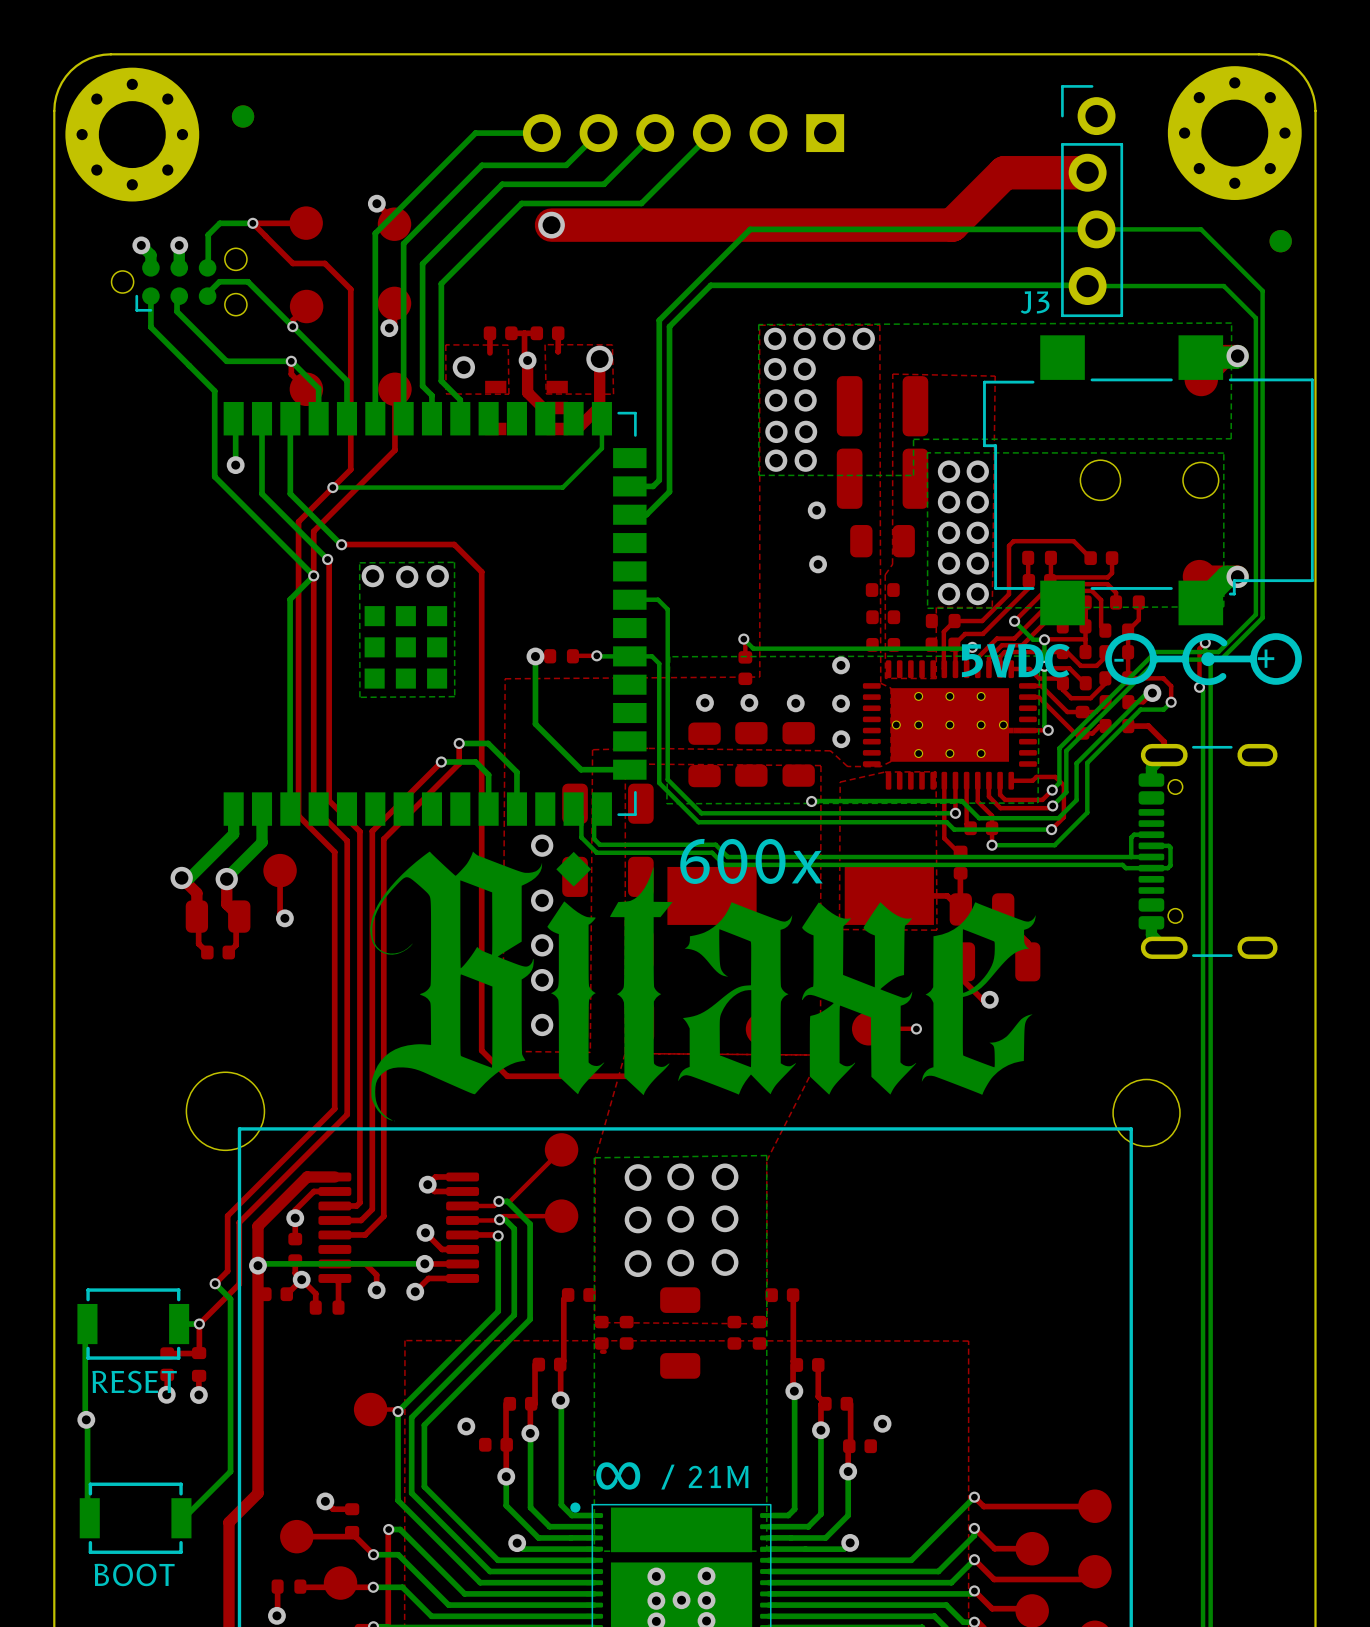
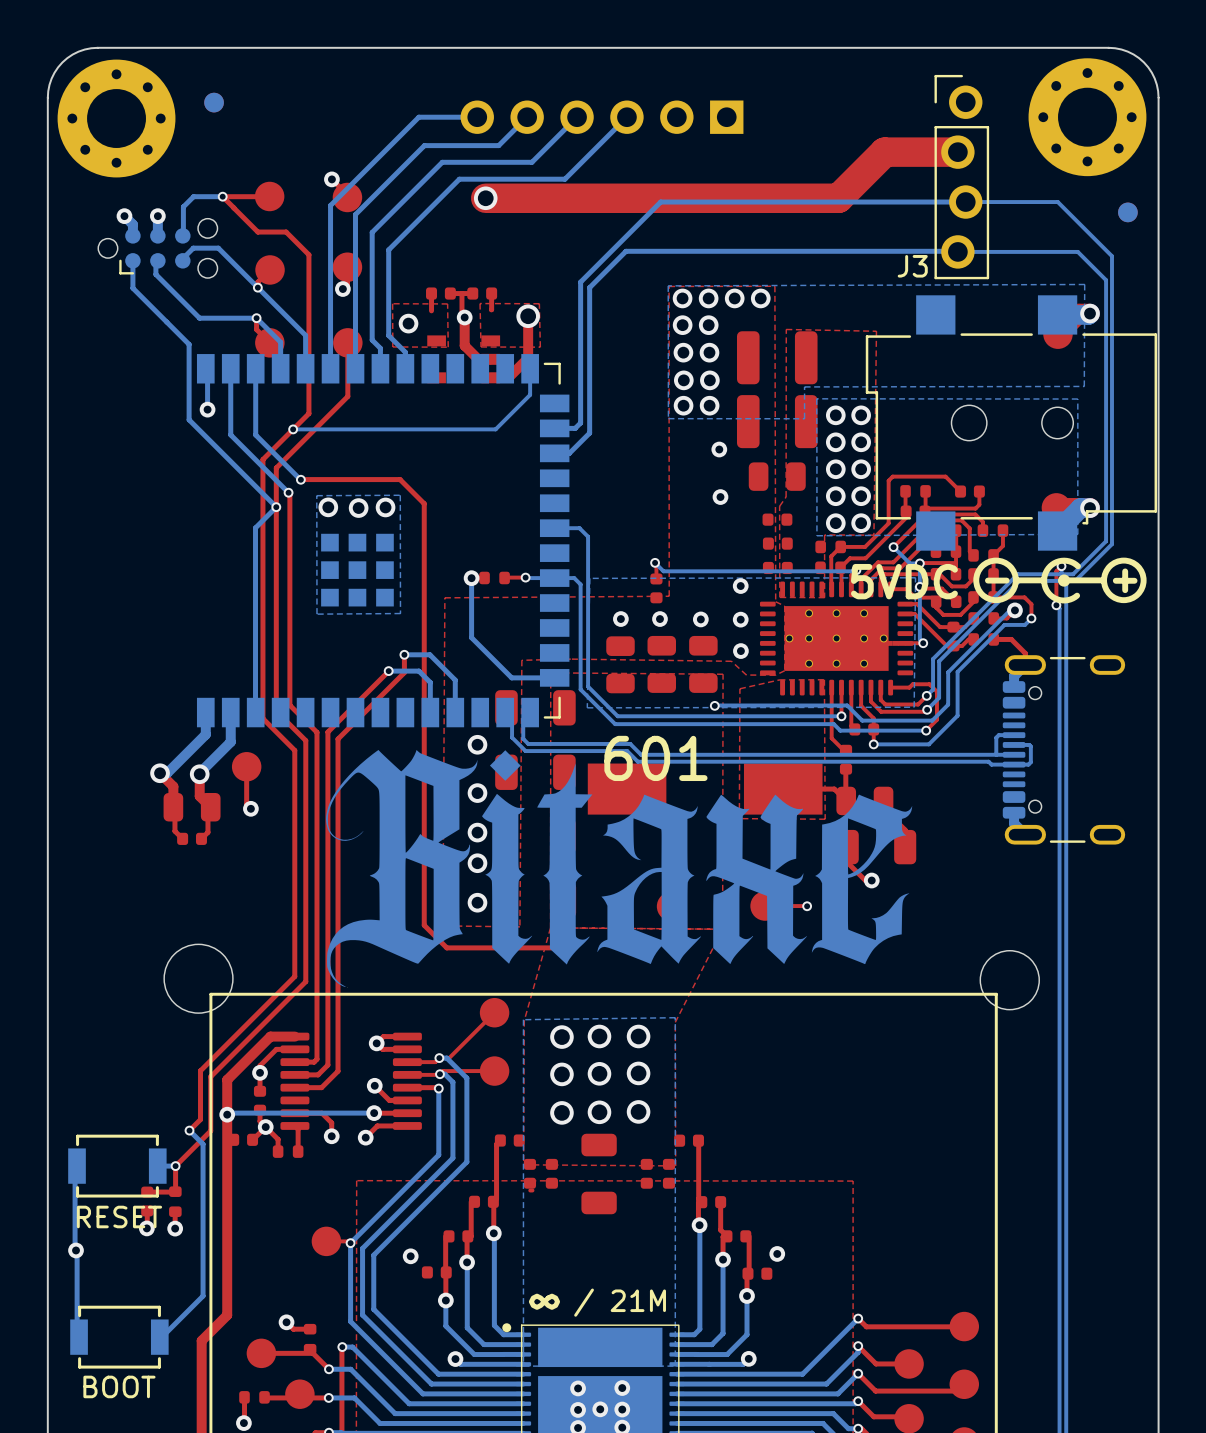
text: 600x (751, 861) -> 601 (655, 758)

